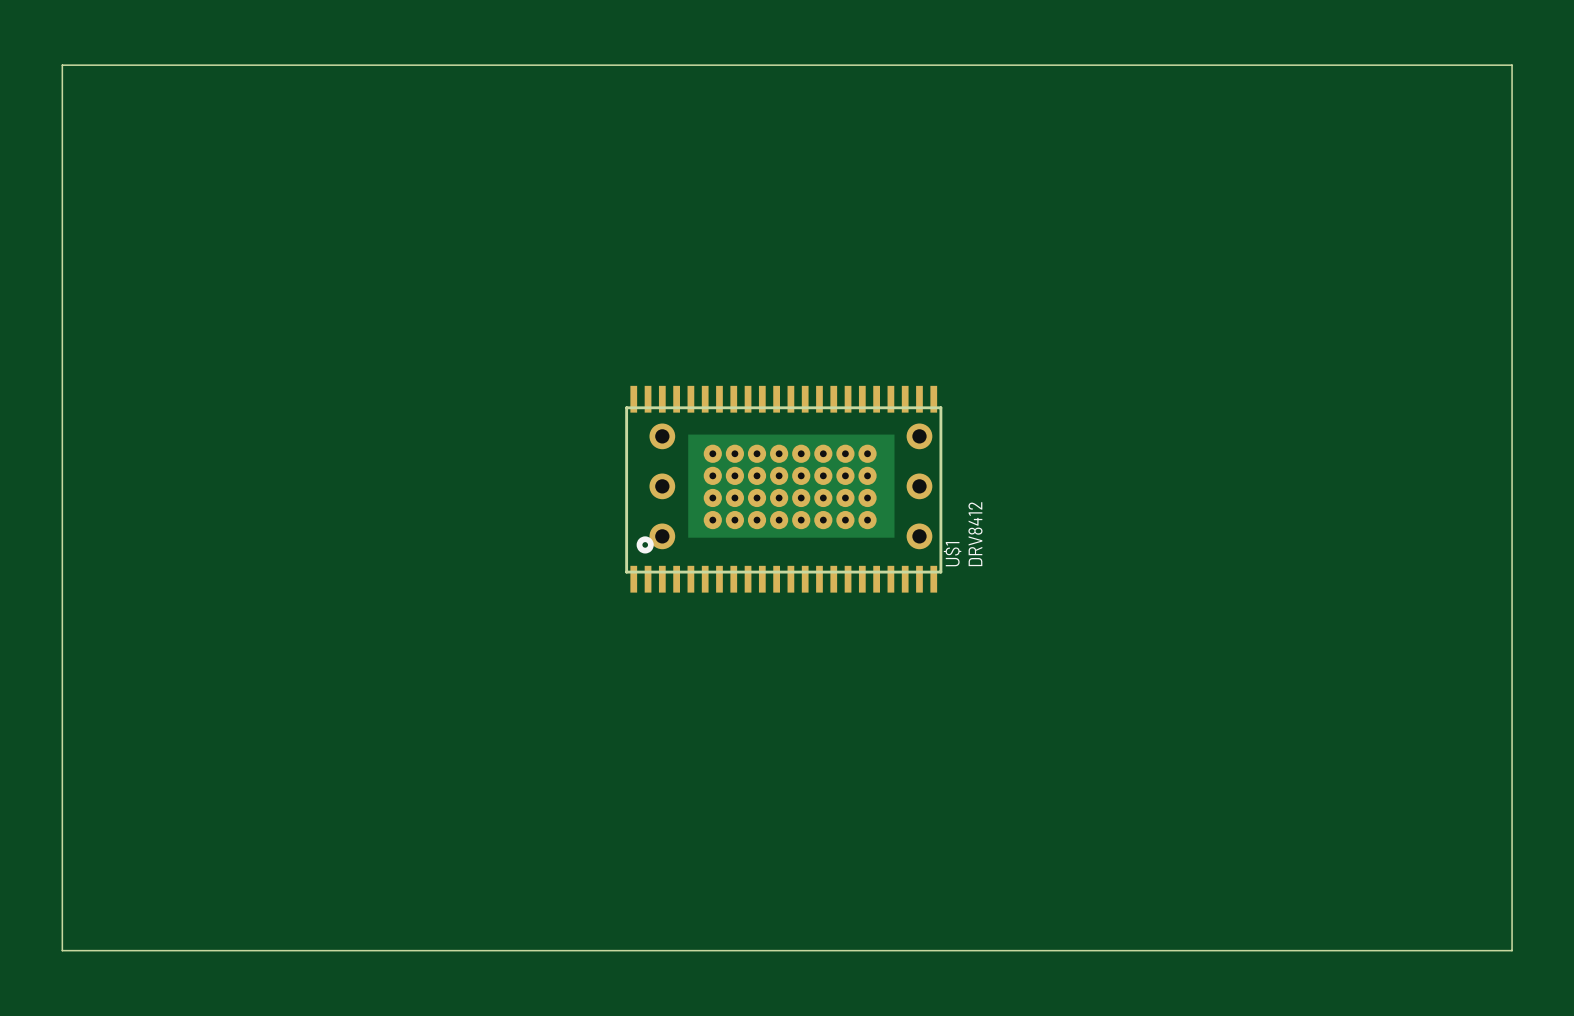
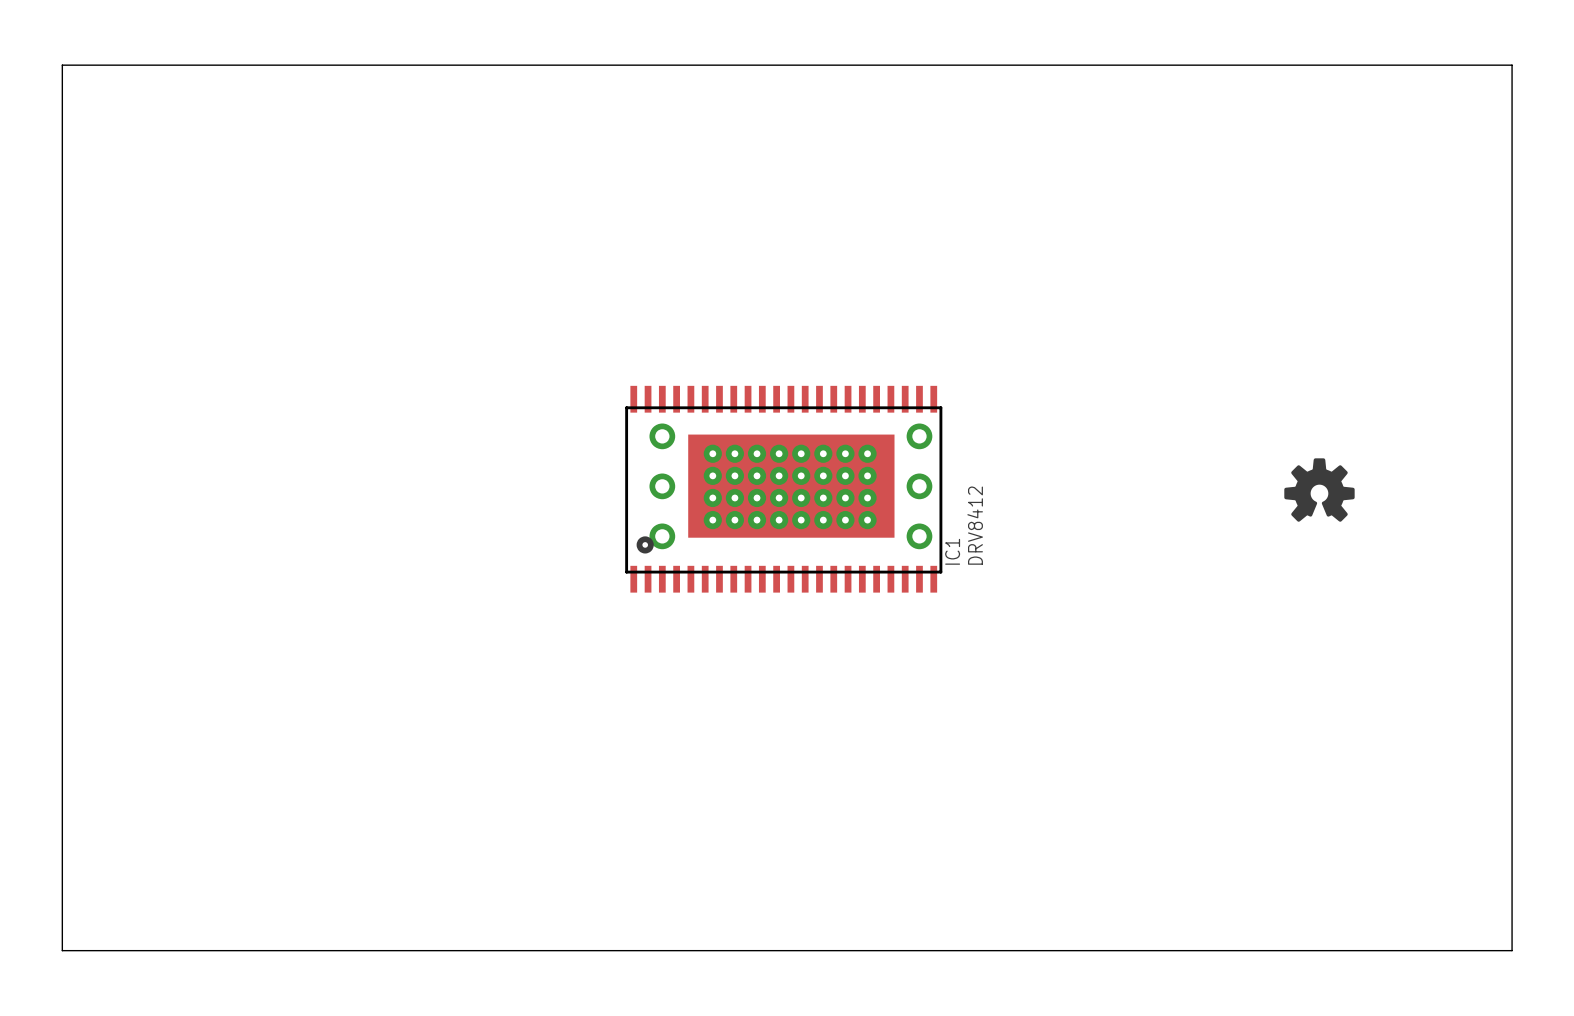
drawing: none -> [1284, 458, 1355, 522]
U$1 name: U$1 (952, 554) -> IC1 (952, 551)

